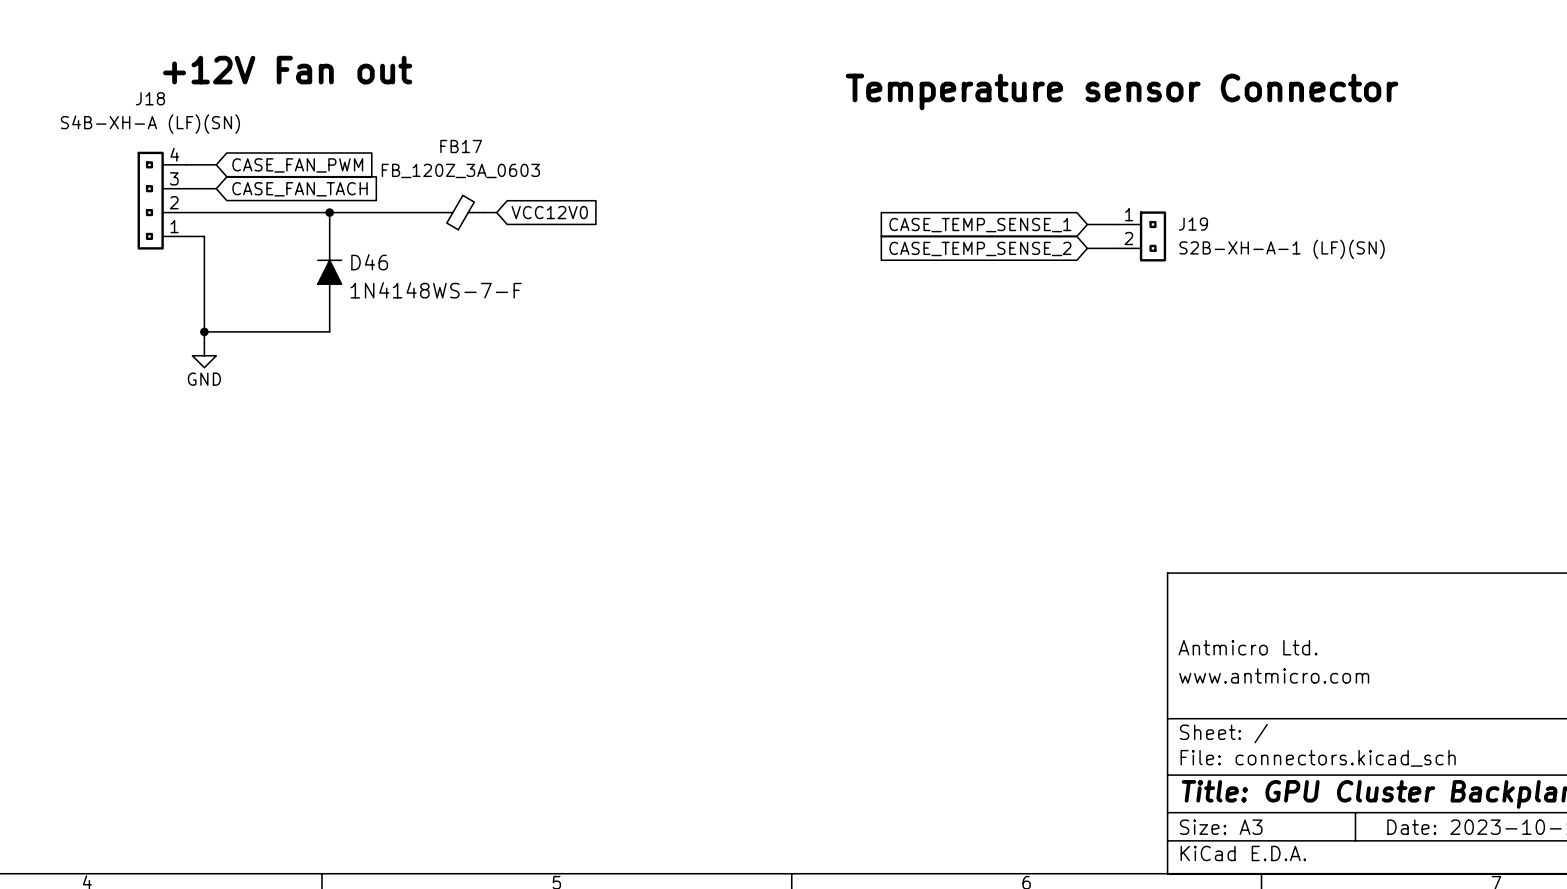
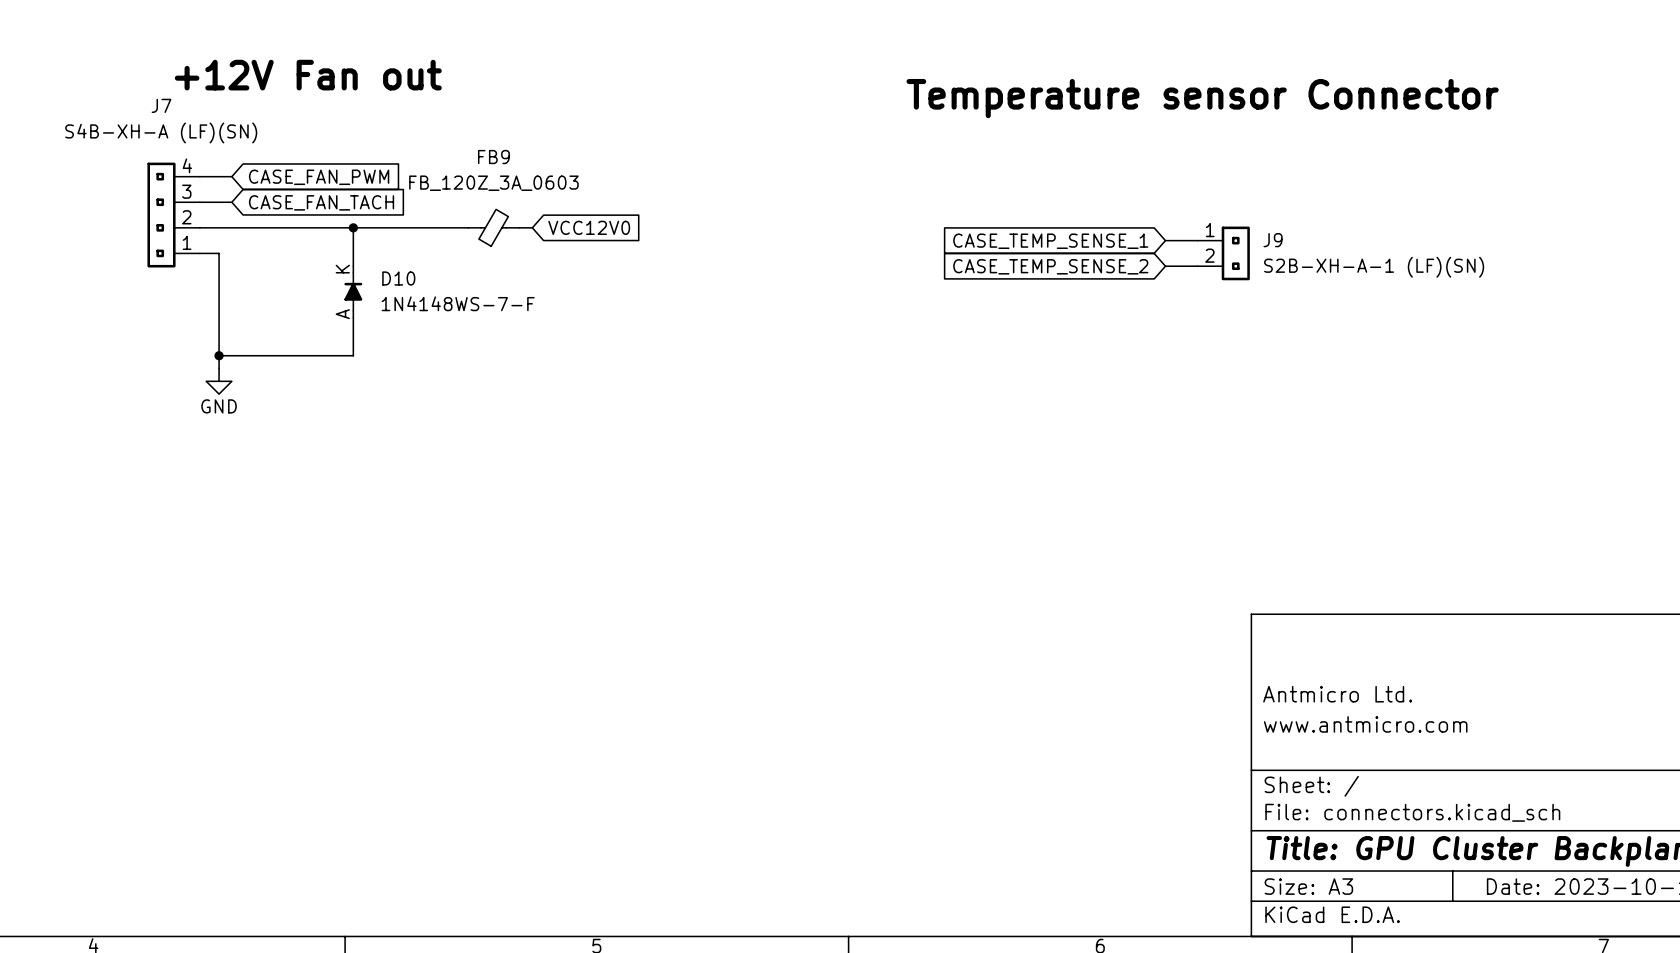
J18 name: J18 (150, 98) -> J7 (161, 105)
FB17 name: FB17 (461, 146) -> FB9 (493, 157)
J19 name: J19 (1193, 224) -> J9 (1273, 240)
D46: 1N4148WS-7-F (329, 272) -> none
D10: none -> (353, 291)

